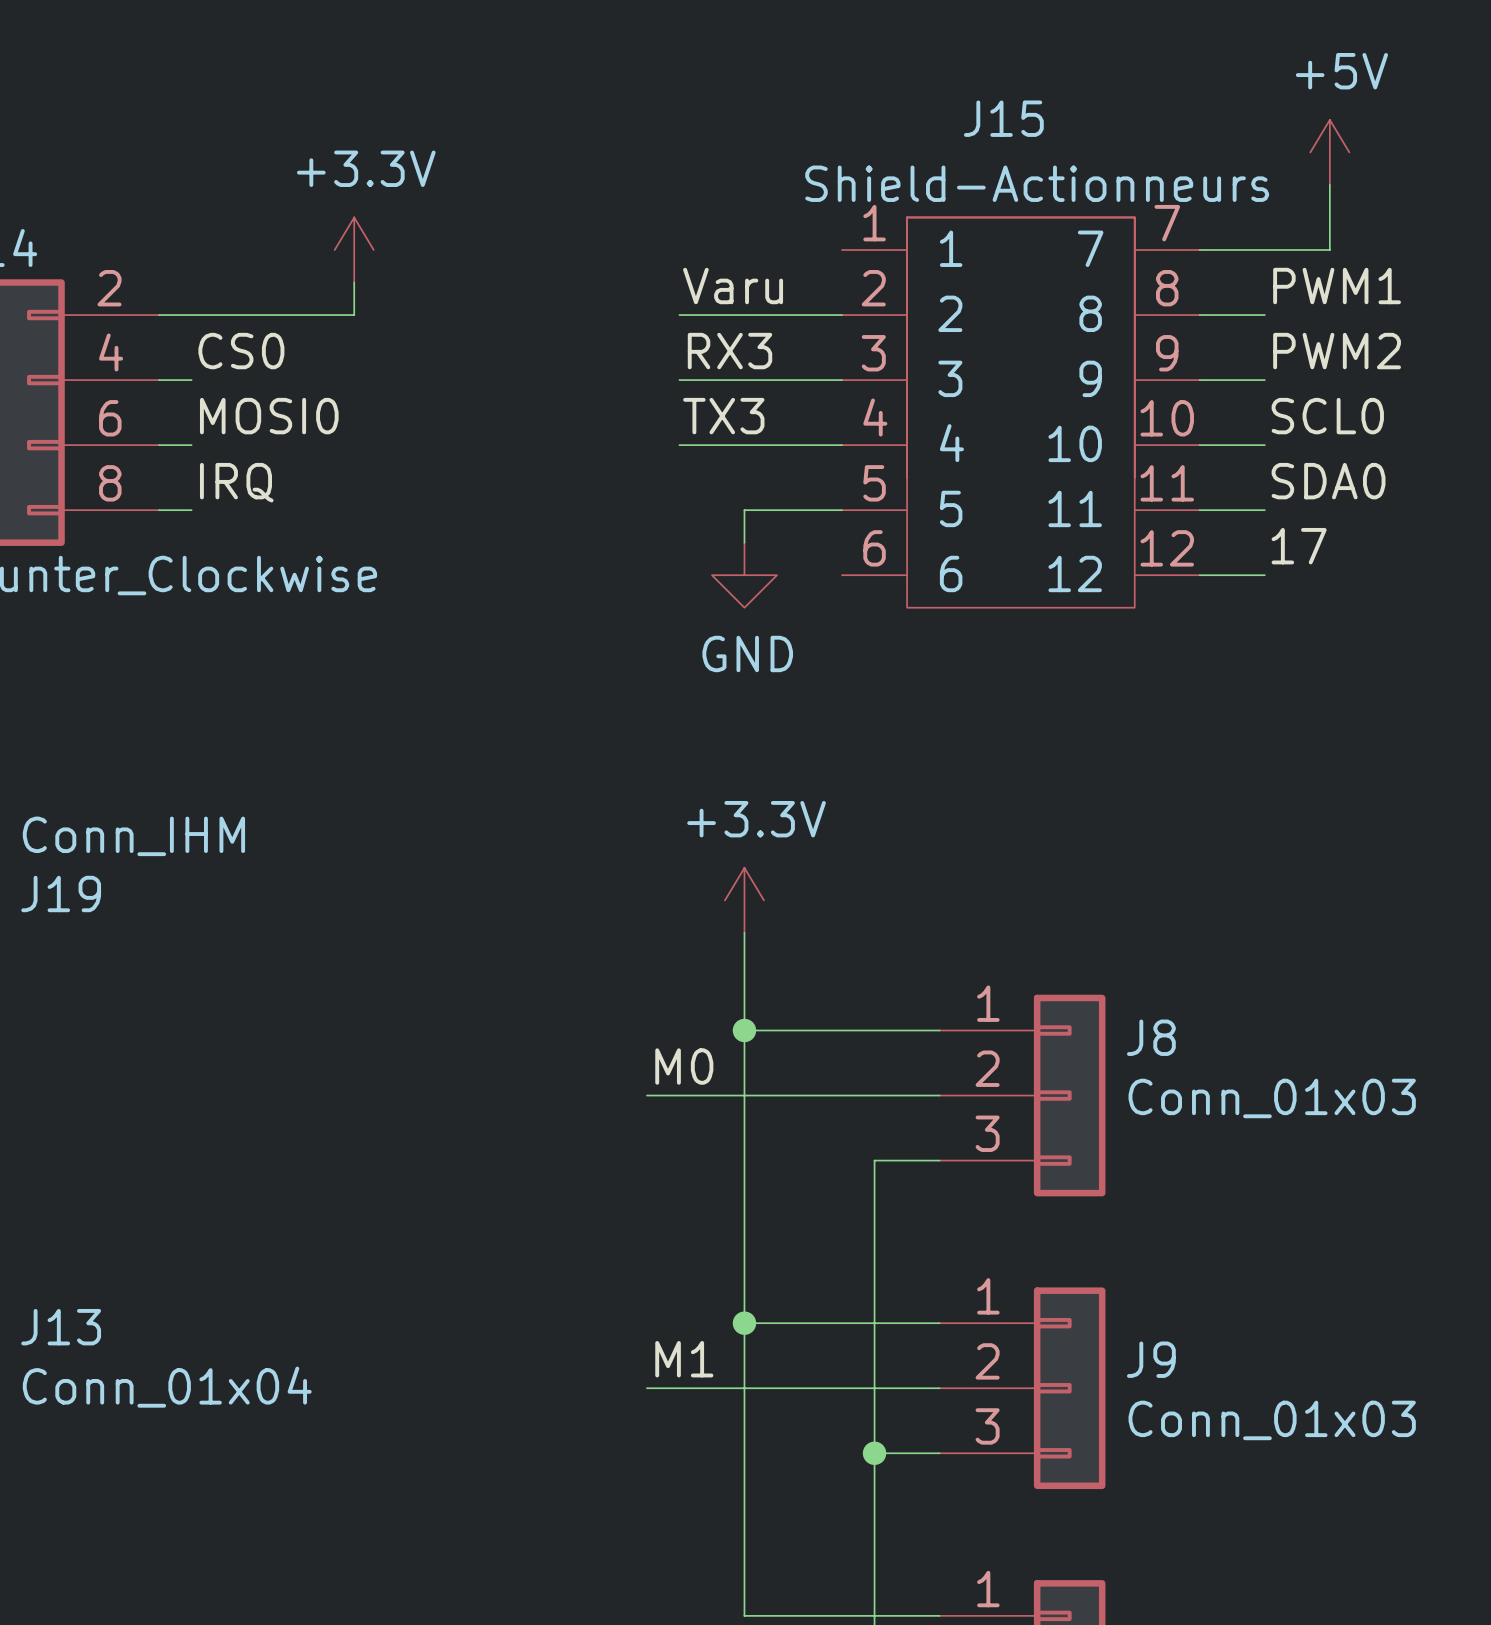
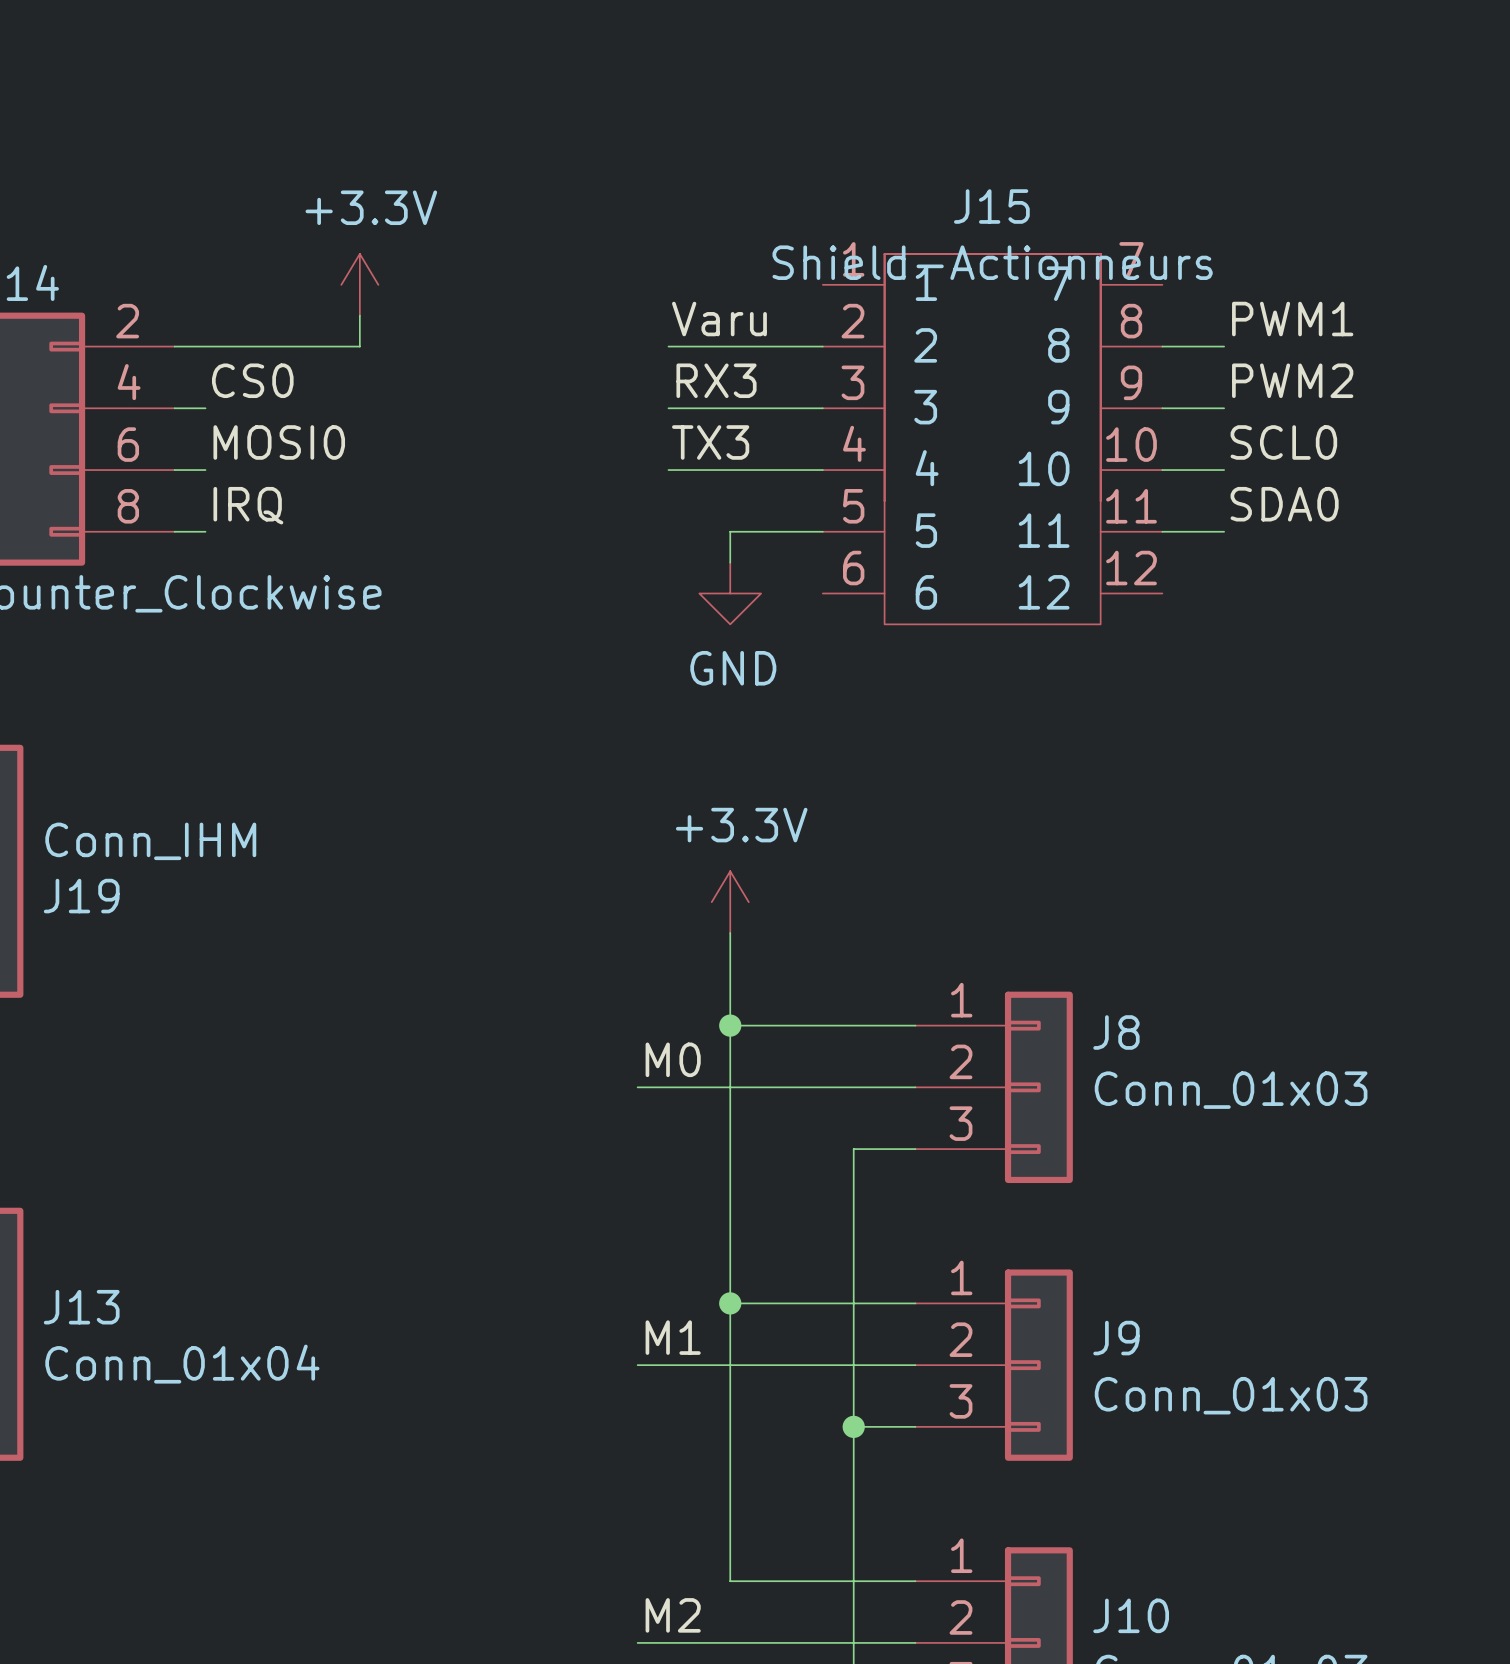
J15 name position: J15 (1003, 118) -> J15 (991, 206)
power symbol: +5V (1329, 152) -> none
J15 value position: Shield-Actionneurs (1037, 183) -> Shield-Actionneurs (992, 262)
wire: (1329, 184) (1329, 249) (1199, 249) -> none
label: 17 (1299, 546) -> none
wire: (1199, 575) (1264, 575) -> none

